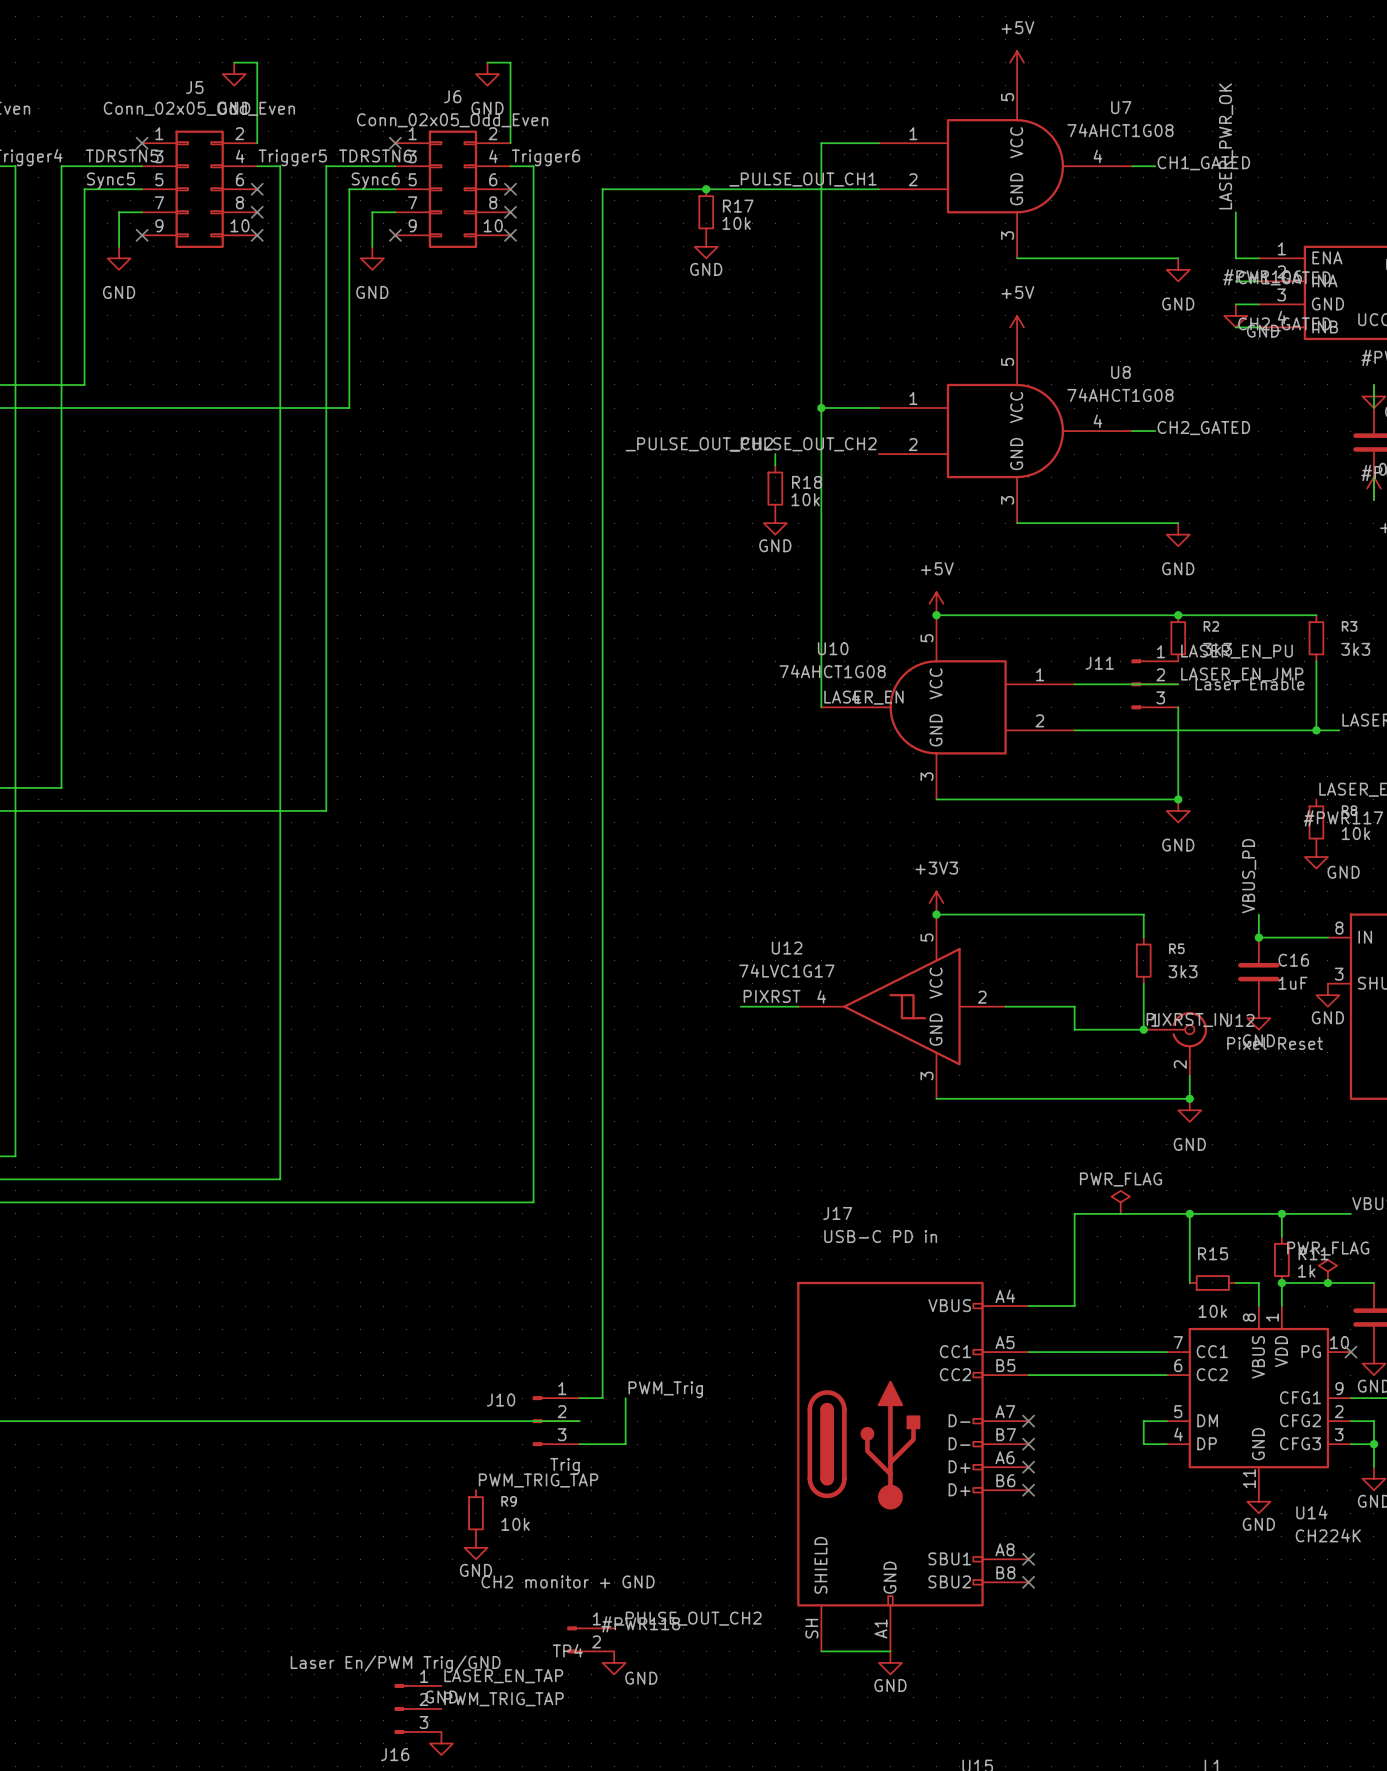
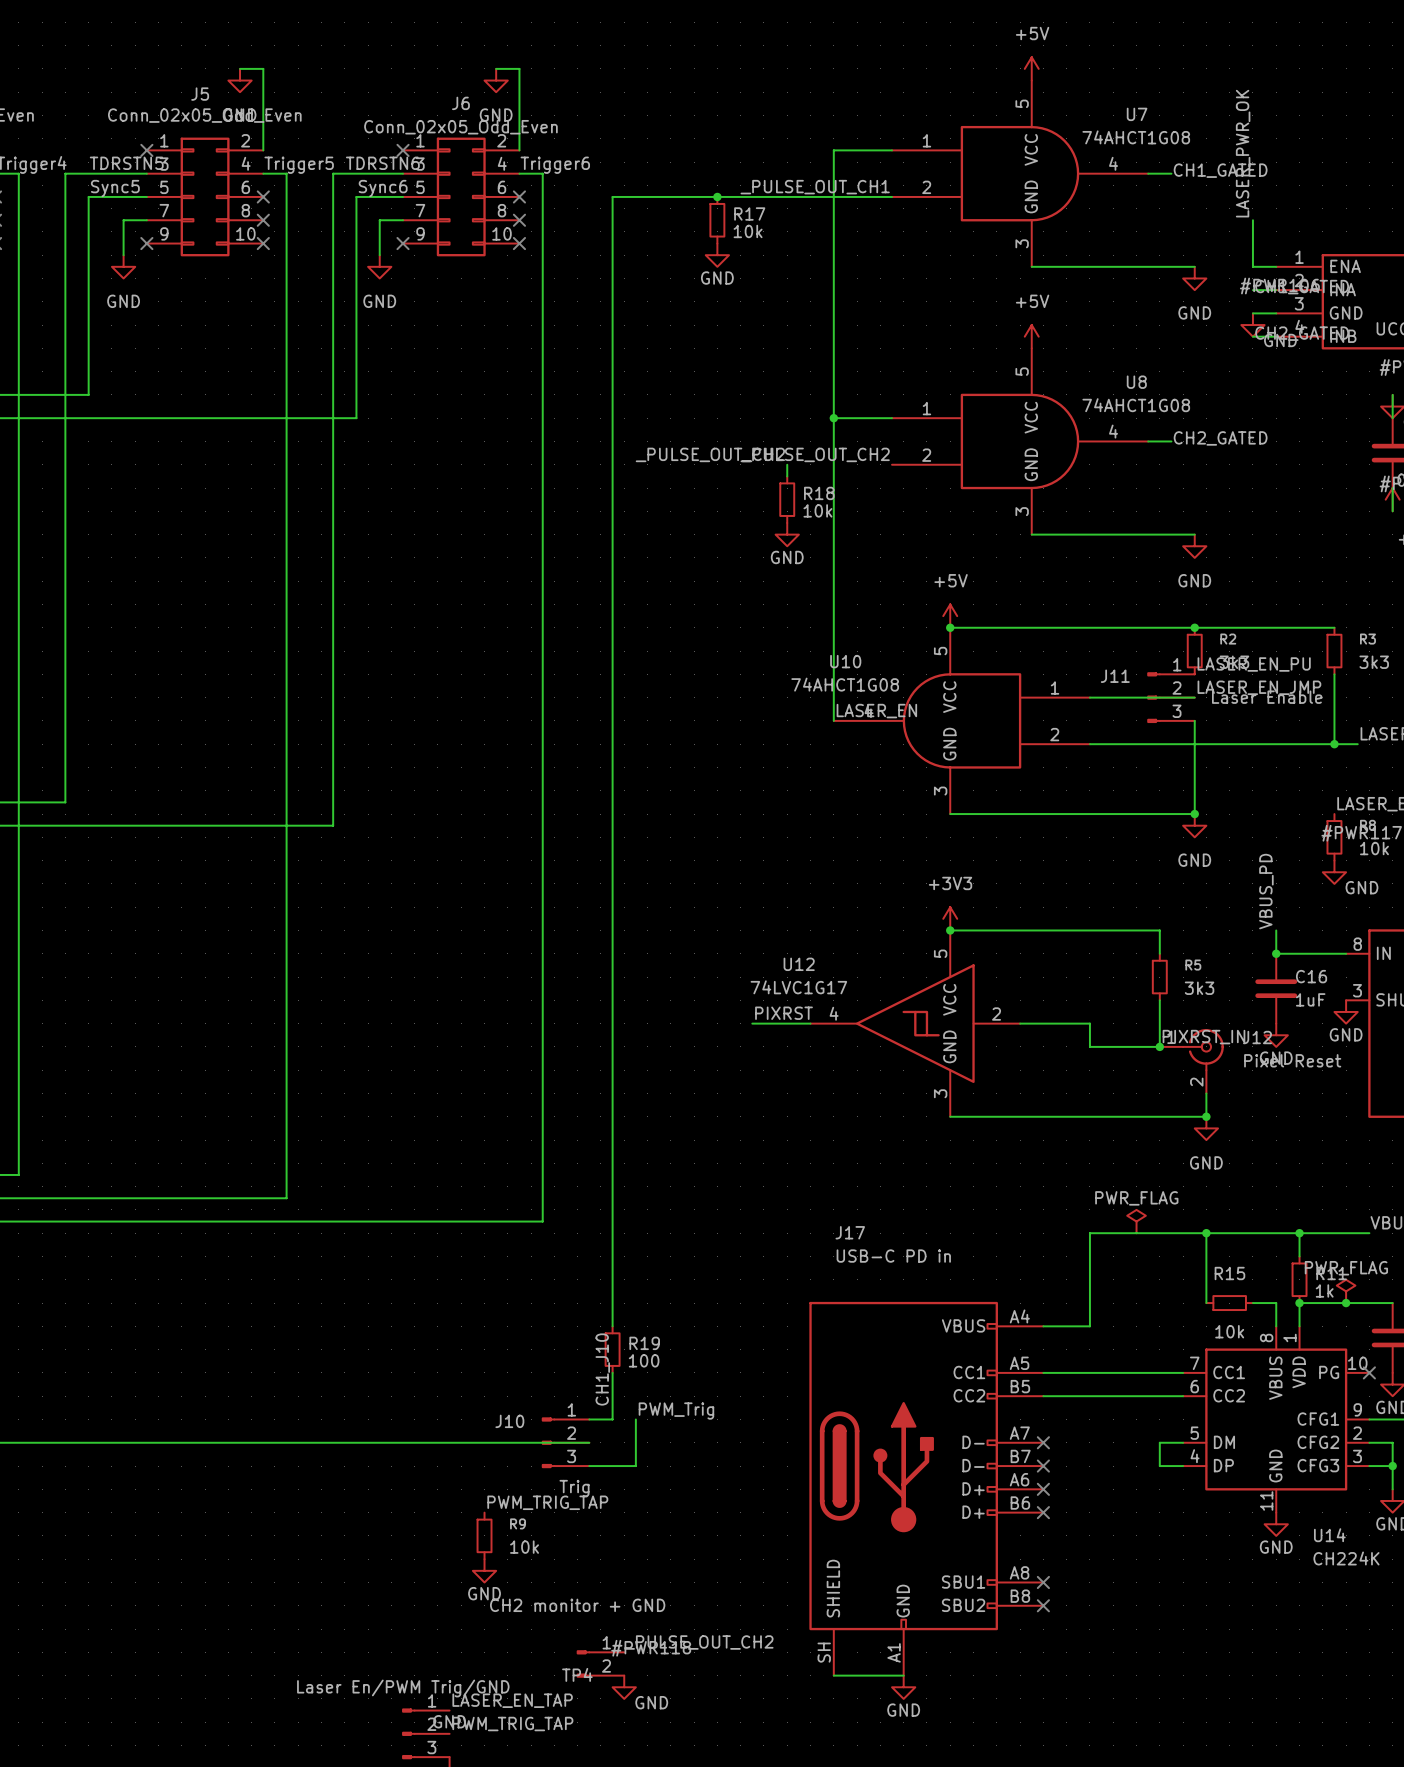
wire: (602, 1306) (602, 1352) -> none
R19: none -> 100 (612, 1349)
label: none -> CH1_J10 (602, 1369)

